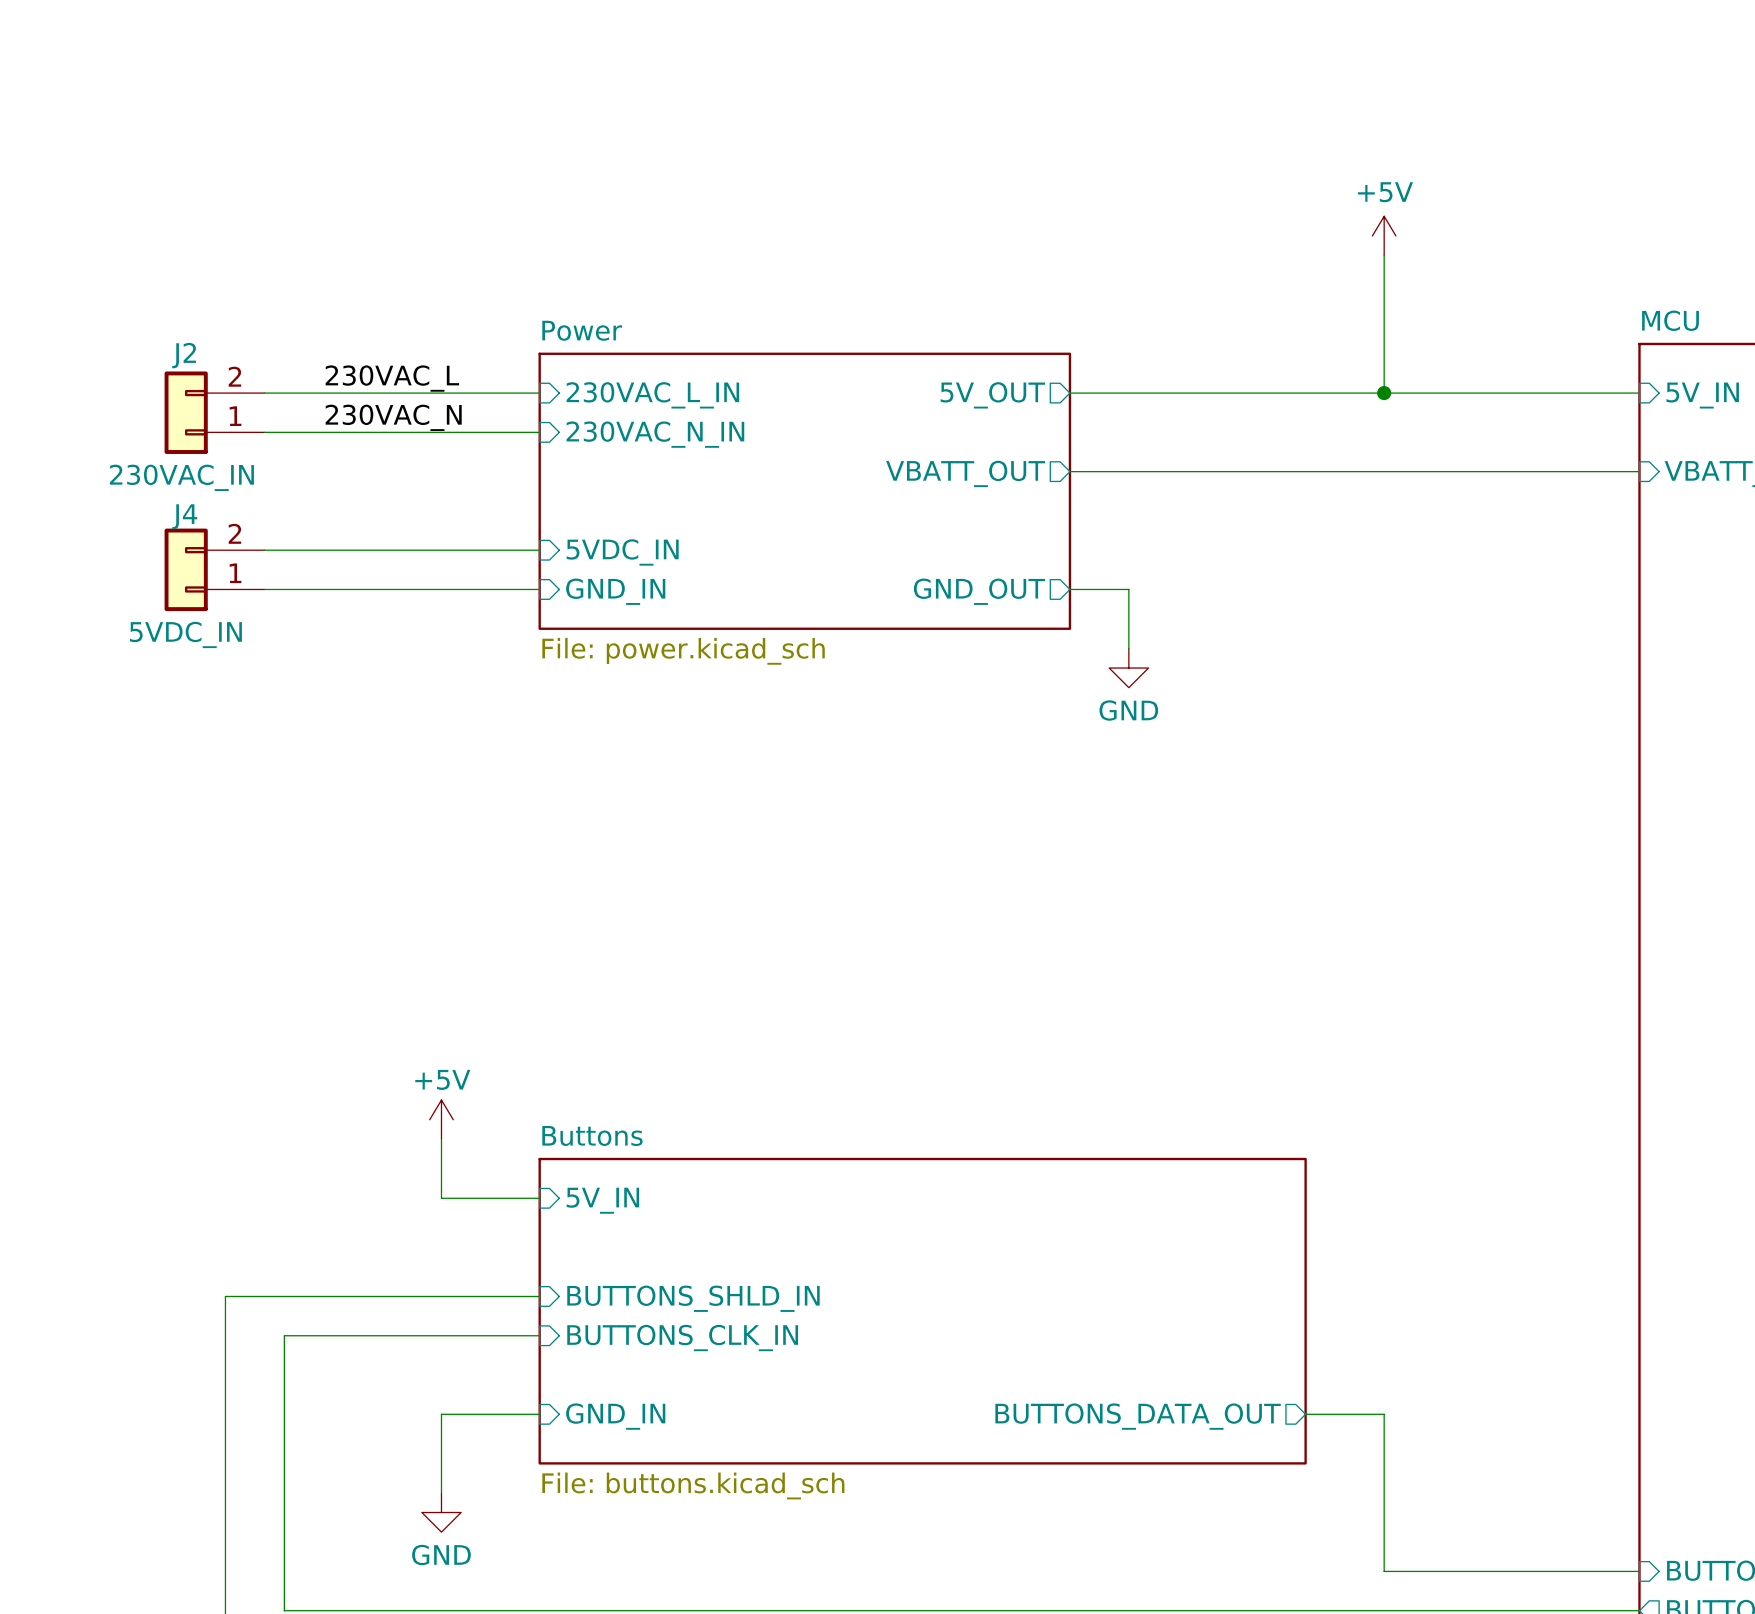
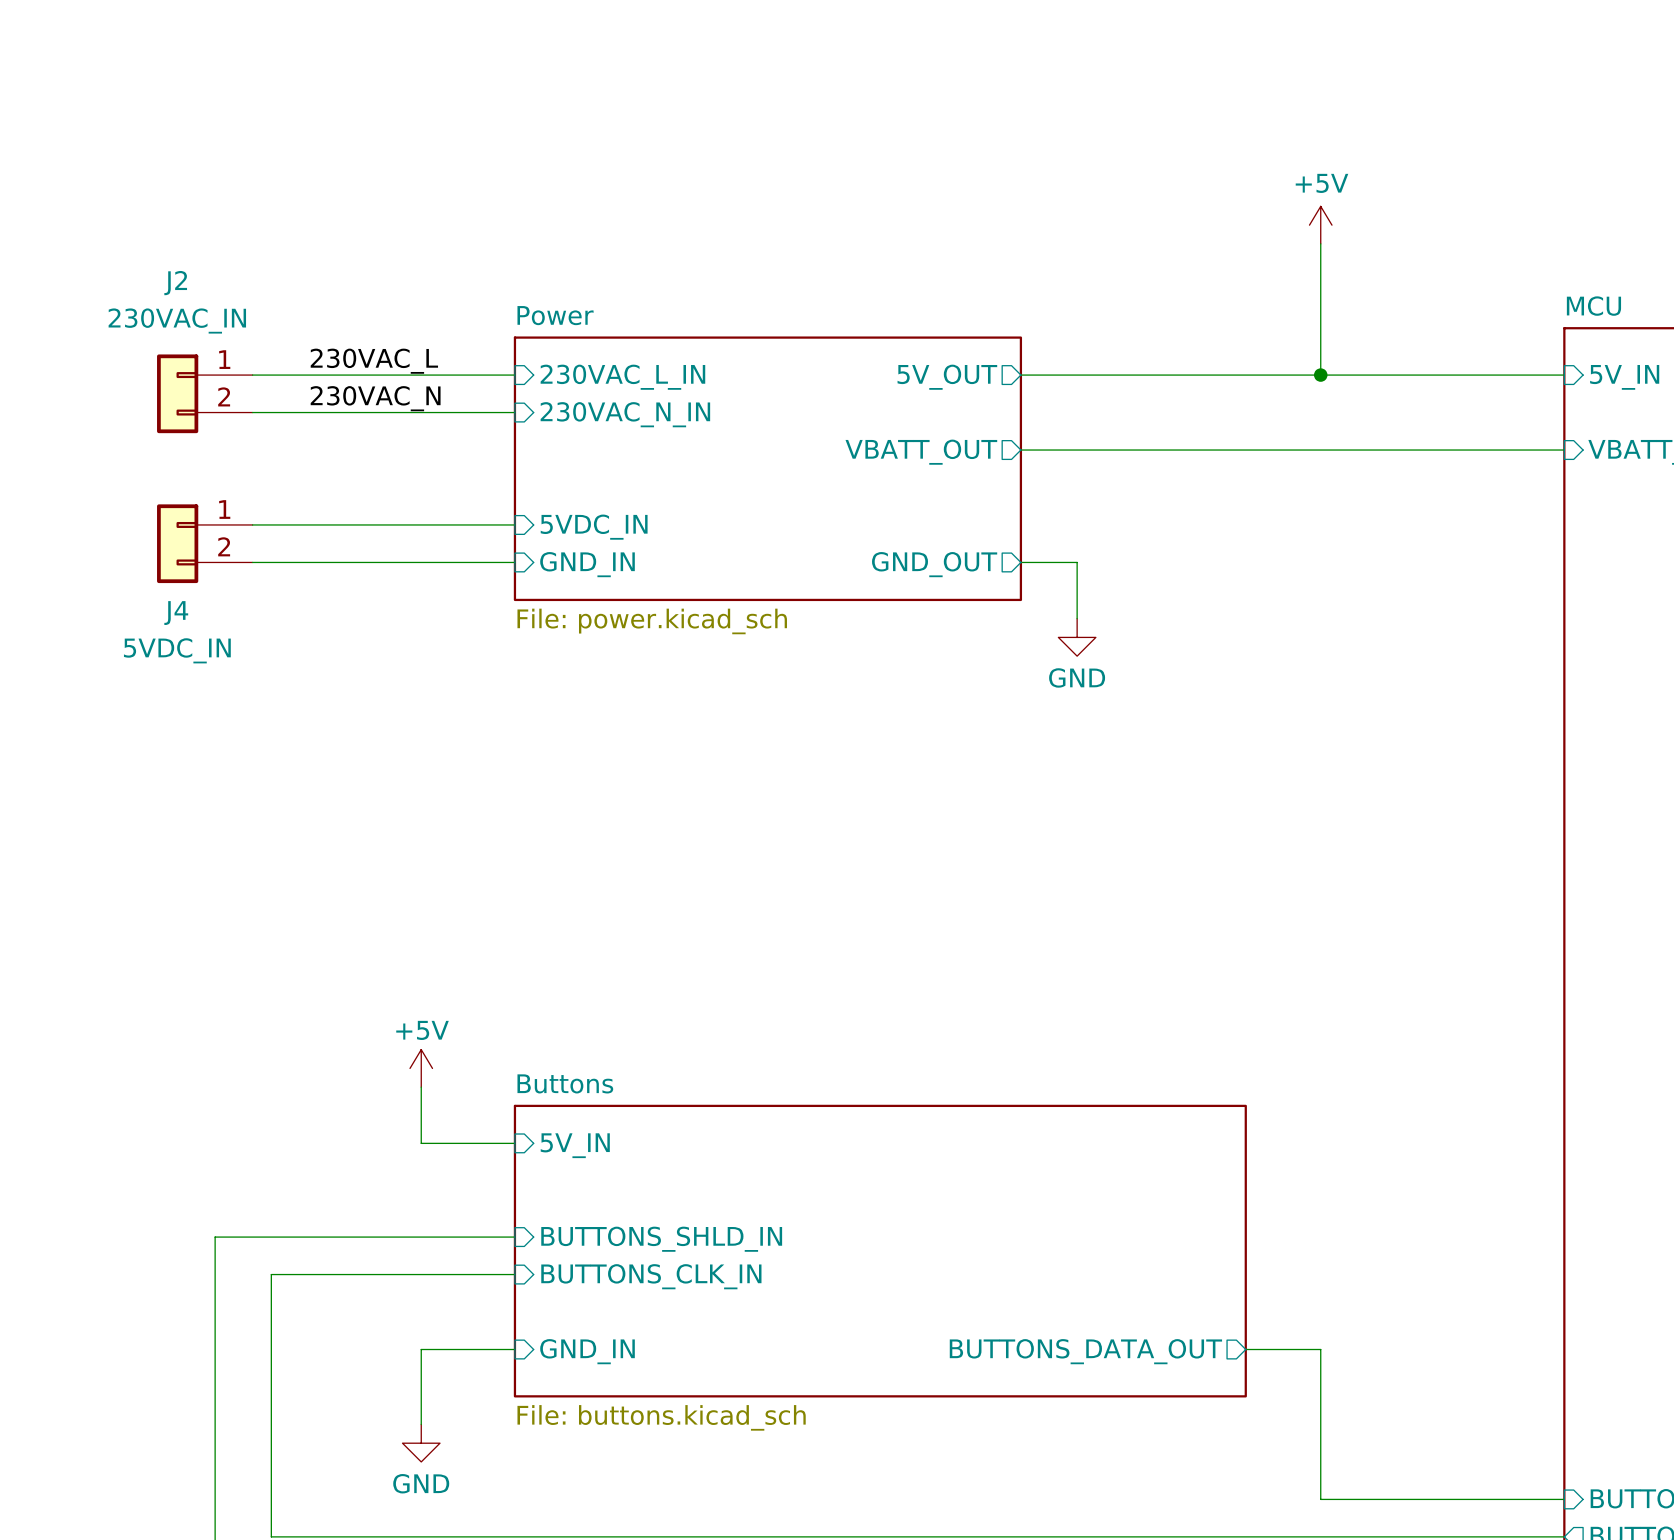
J2 name position: J2 (184, 355) -> J2 (175, 283)
J2 flip: as is (186, 412) -> up-down (177, 393)
J4 flip: as is (186, 569) -> up-down (177, 543)
J4 value position: 5VDC_IN (185, 634) -> 5VDC_IN (177, 650)

